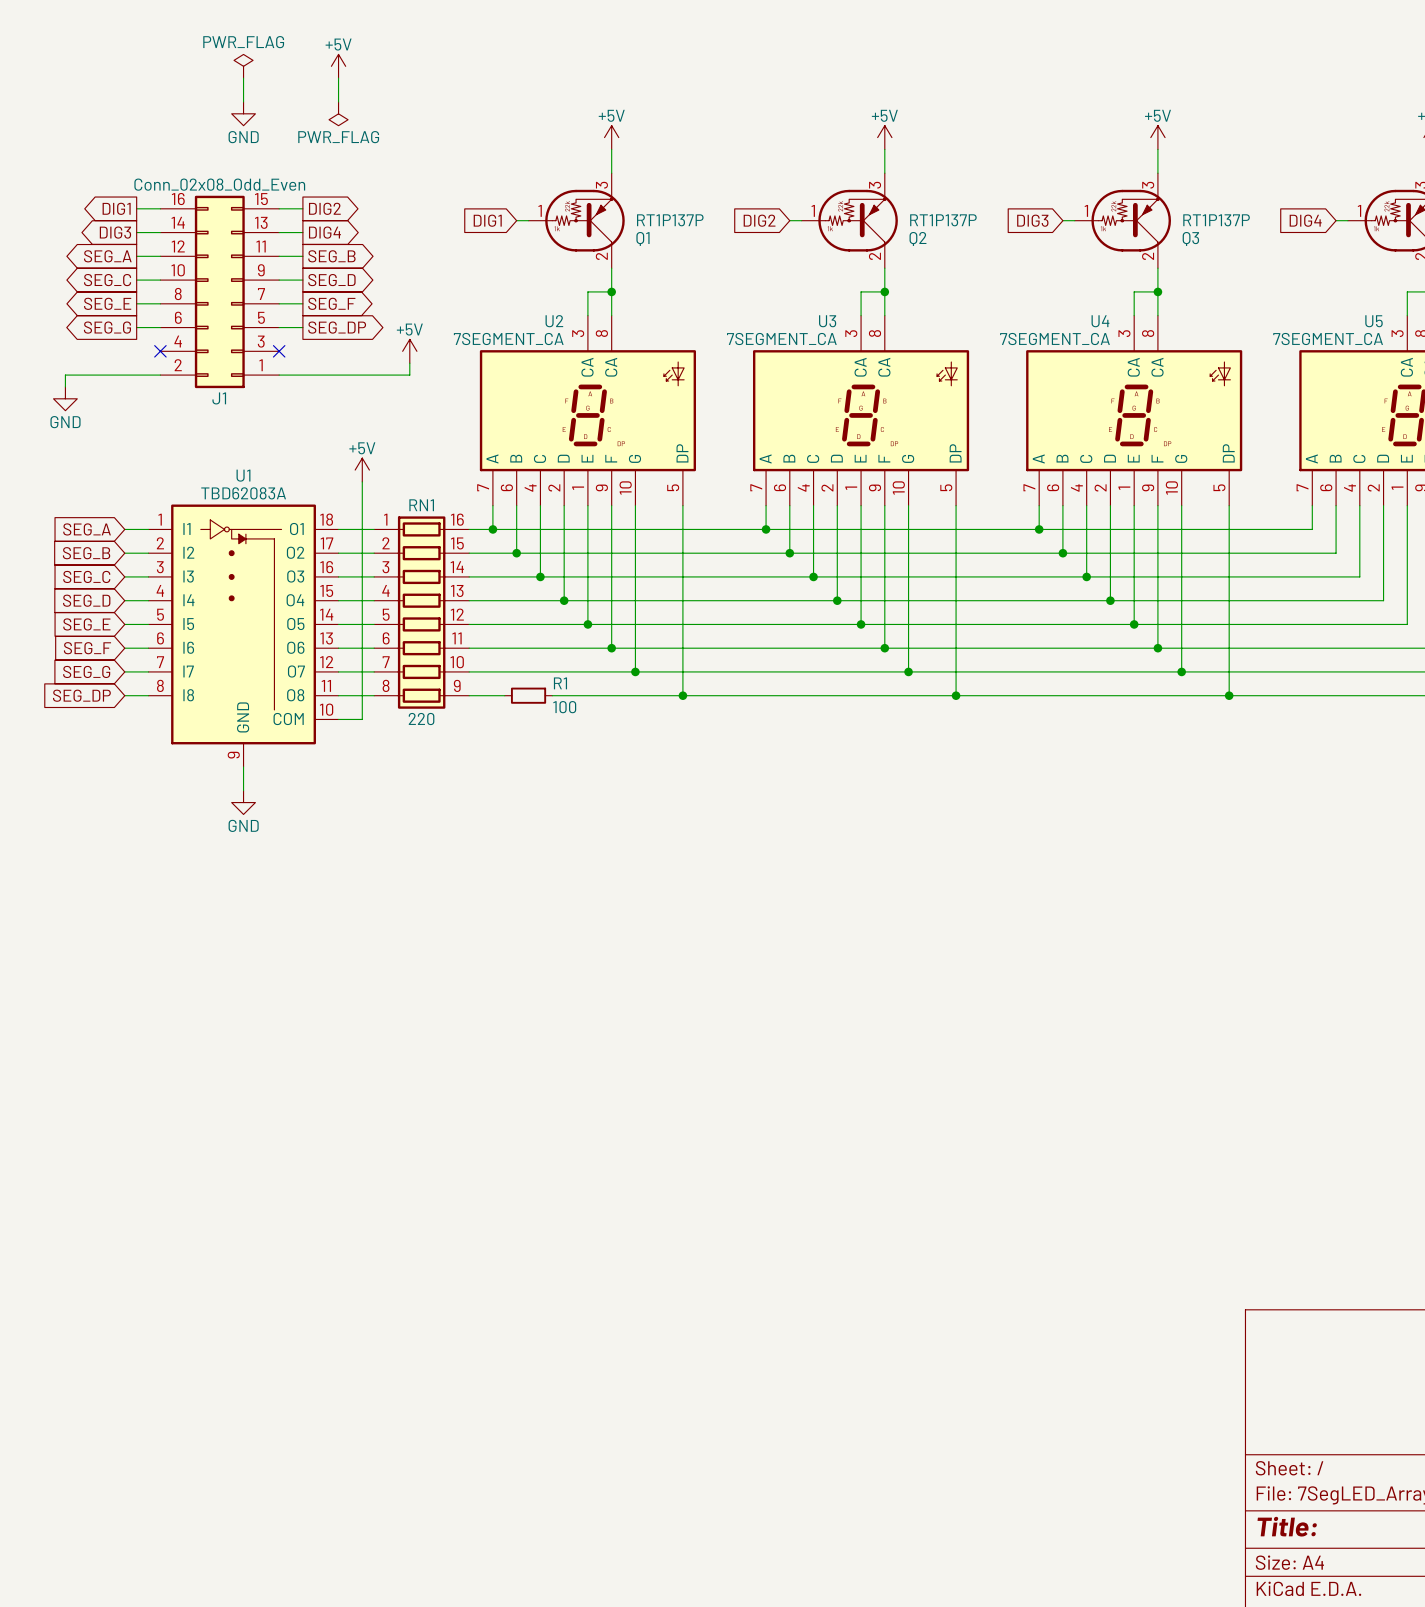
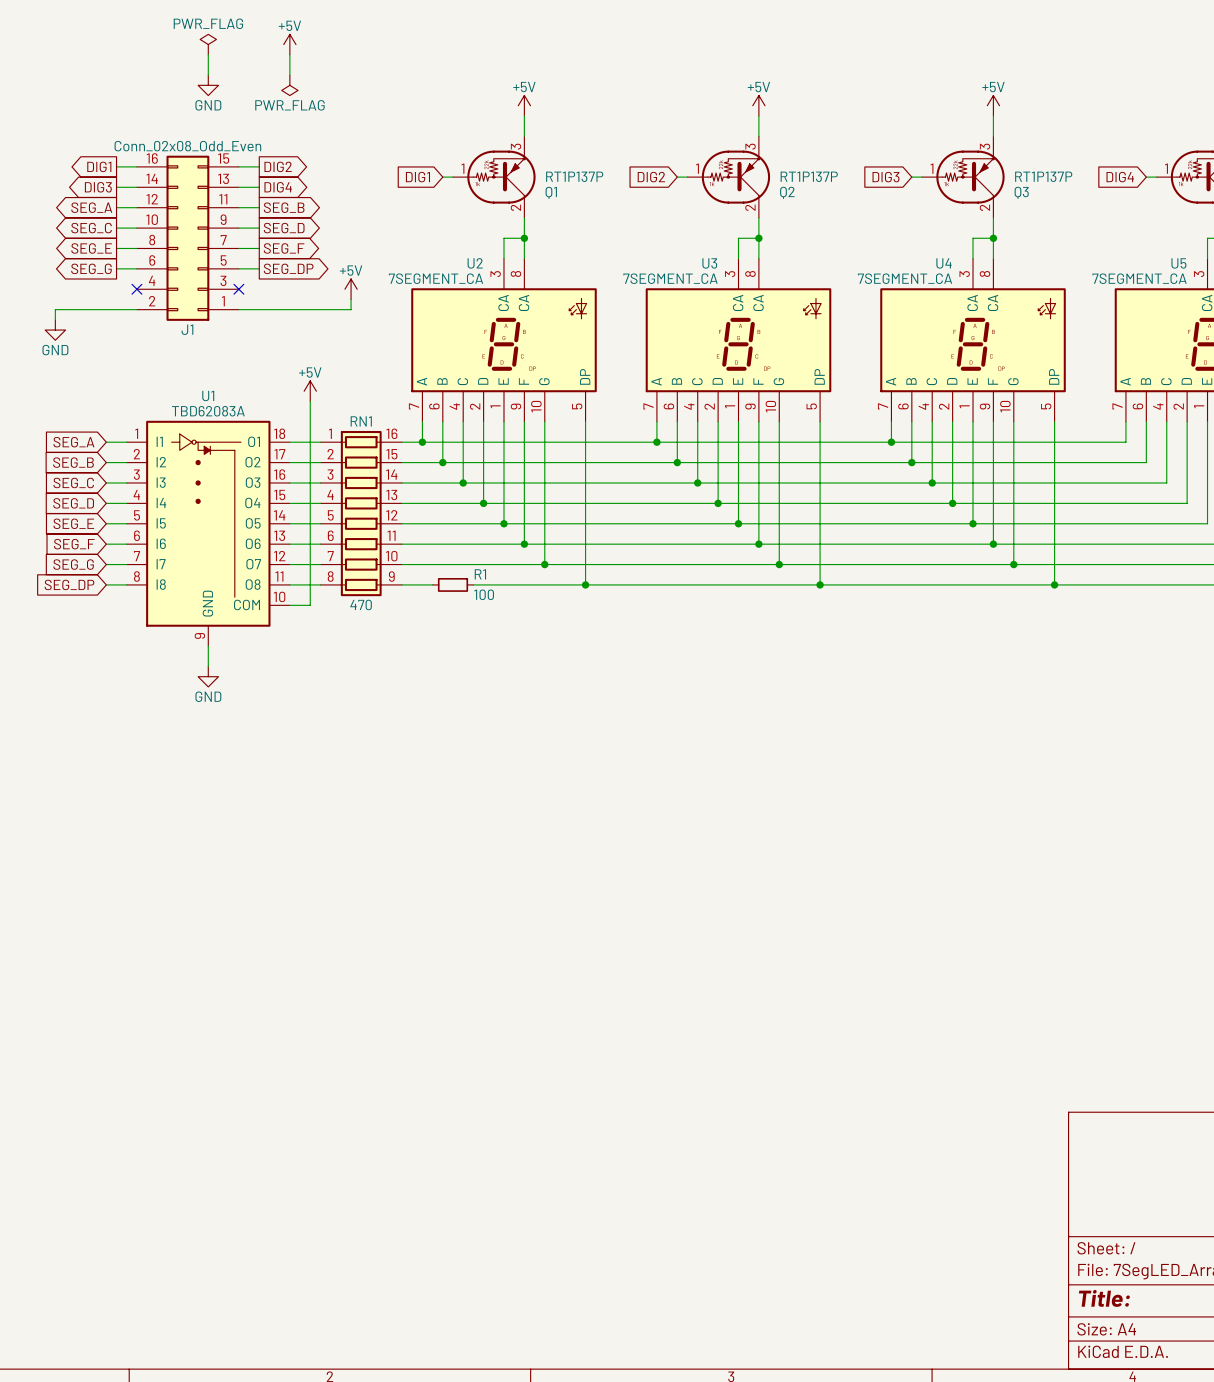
RN1 value: 220 (421, 719) -> 470 (361, 604)

